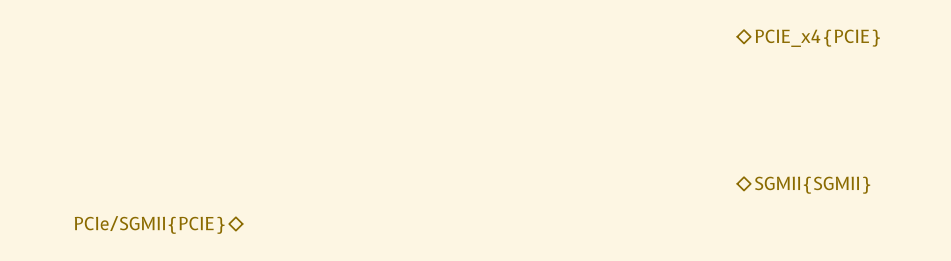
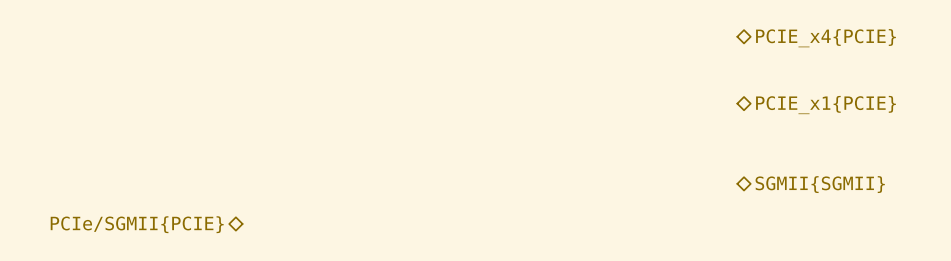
hierarchical label: none -> PCIE_x1{PCIE} (825, 105)

